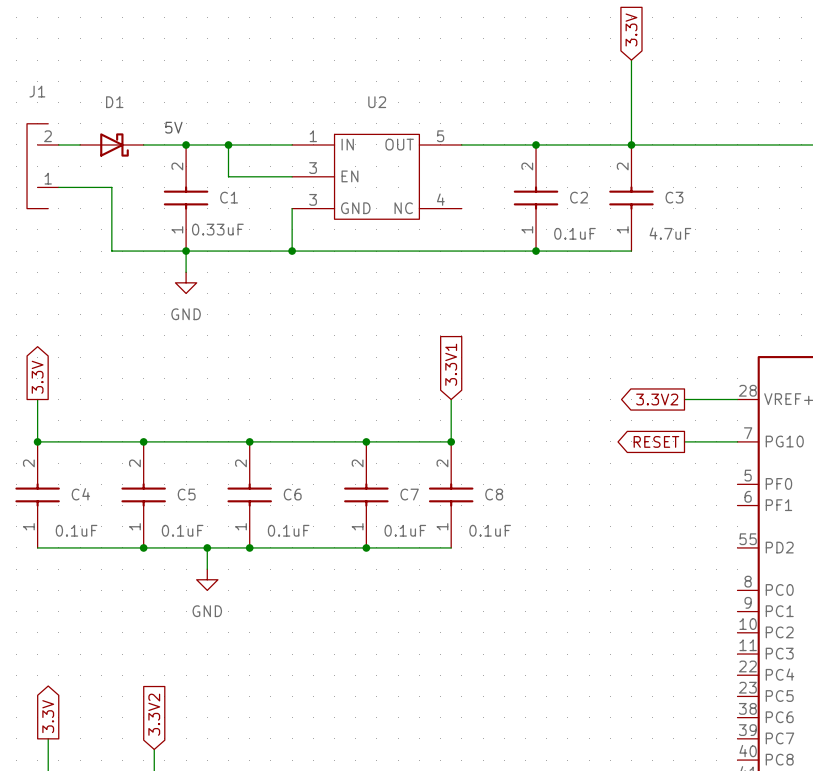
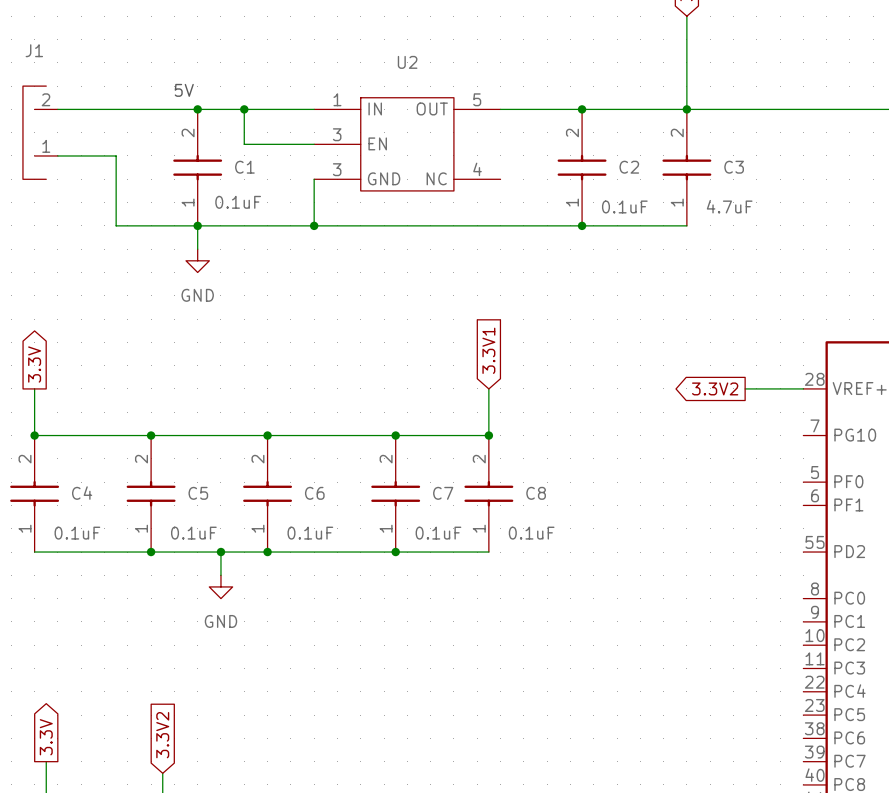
D1: (111, 144) -> none
C1 value: 0.33uF (217, 229) -> 0.1uF (238, 202)
global label: RESET (656, 441) -> none
wire: (684, 441) (737, 441) -> none

